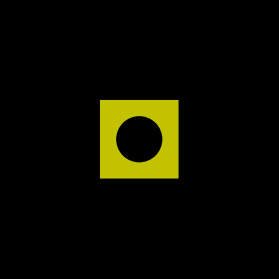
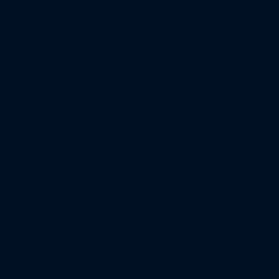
part: (139, 139) -> none

